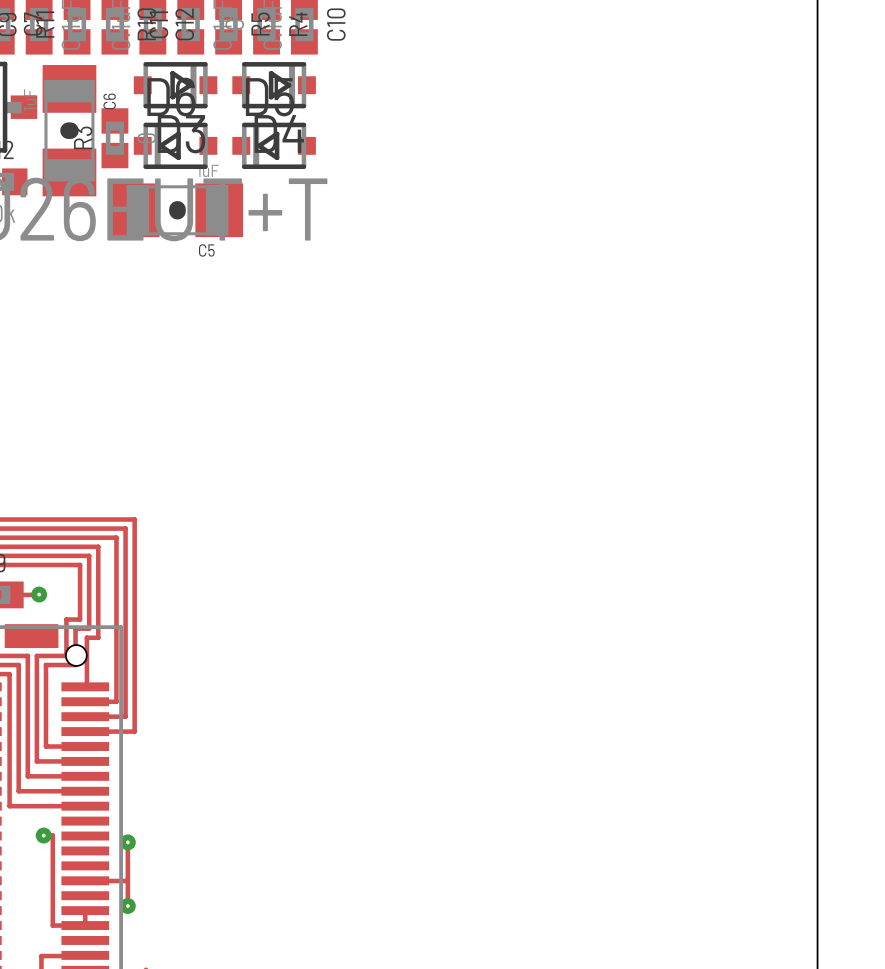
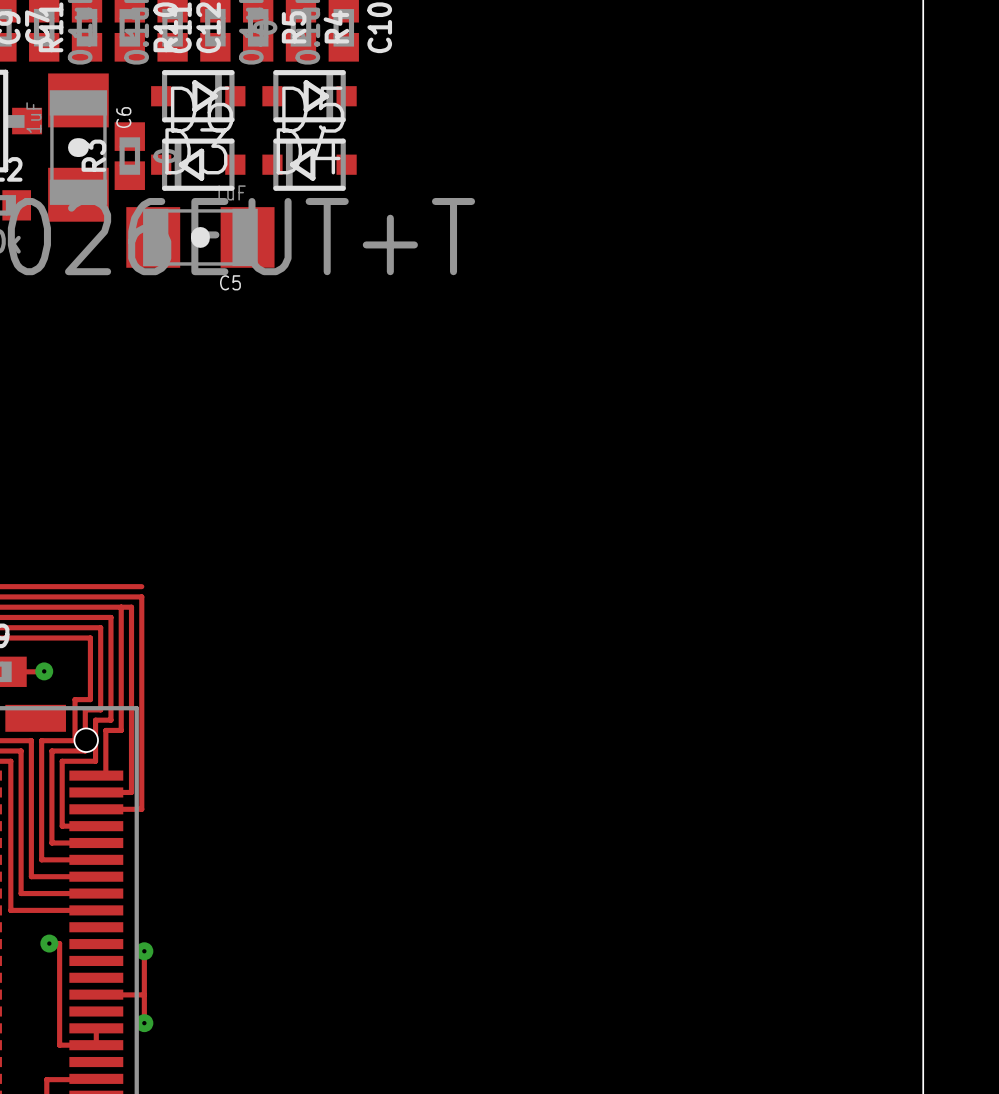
track: (125, 519) (134, 519) (134, 731) (85, 731) -> none
track: none -> (121, 607) (121, 730) (105, 730) (105, 775) (98, 775)
track: (86, 637) (86, 686) -> (98, 720) (95, 720) (95, 761) (62, 761) (62, 826) (96, 826)

